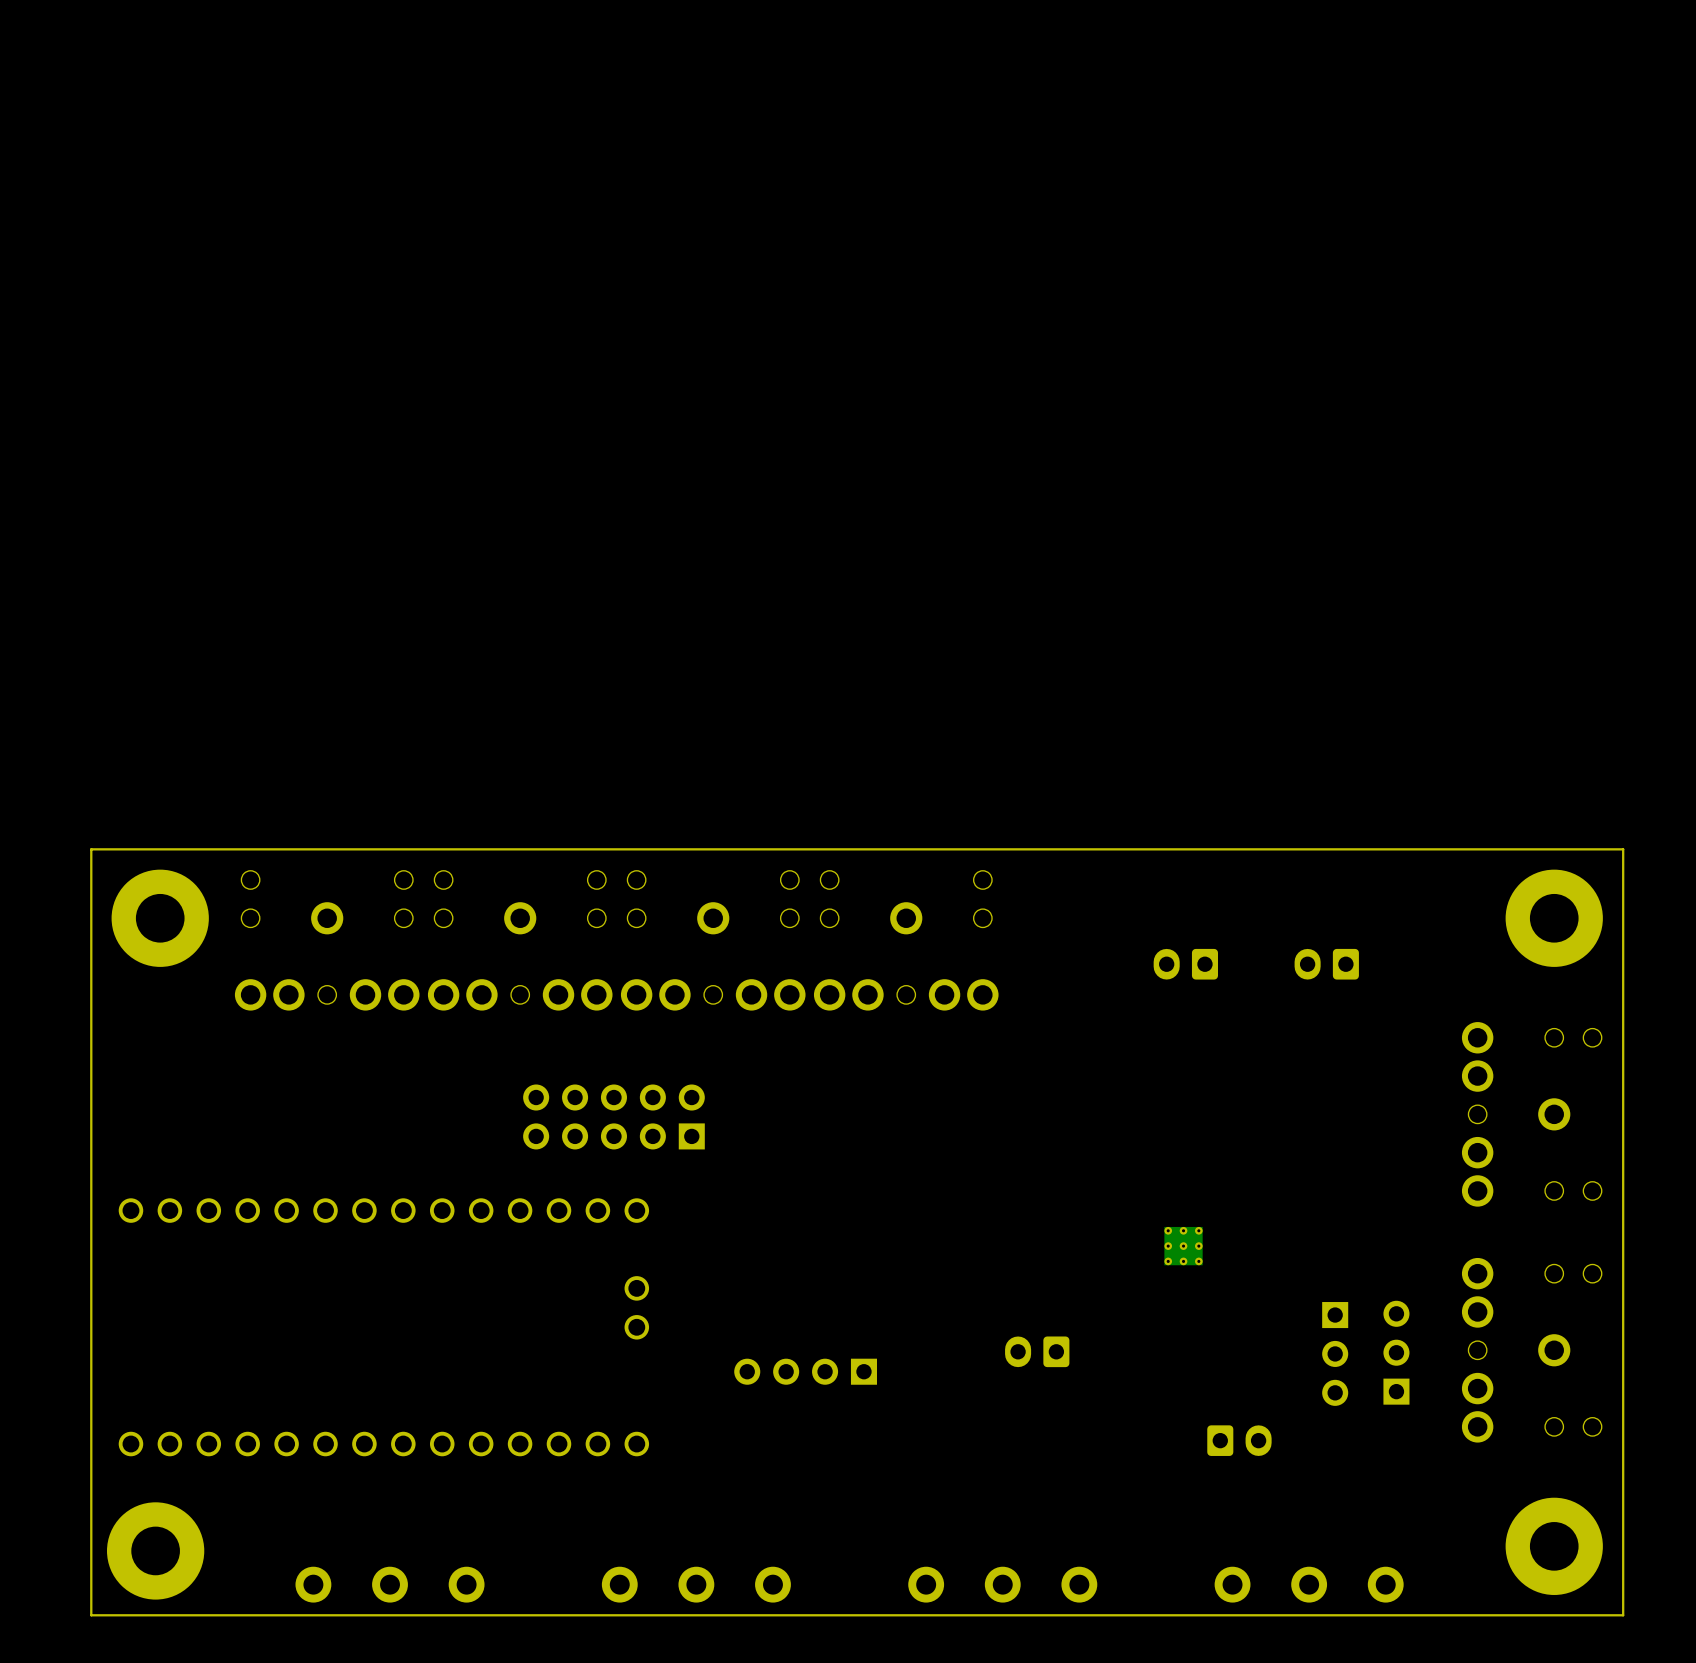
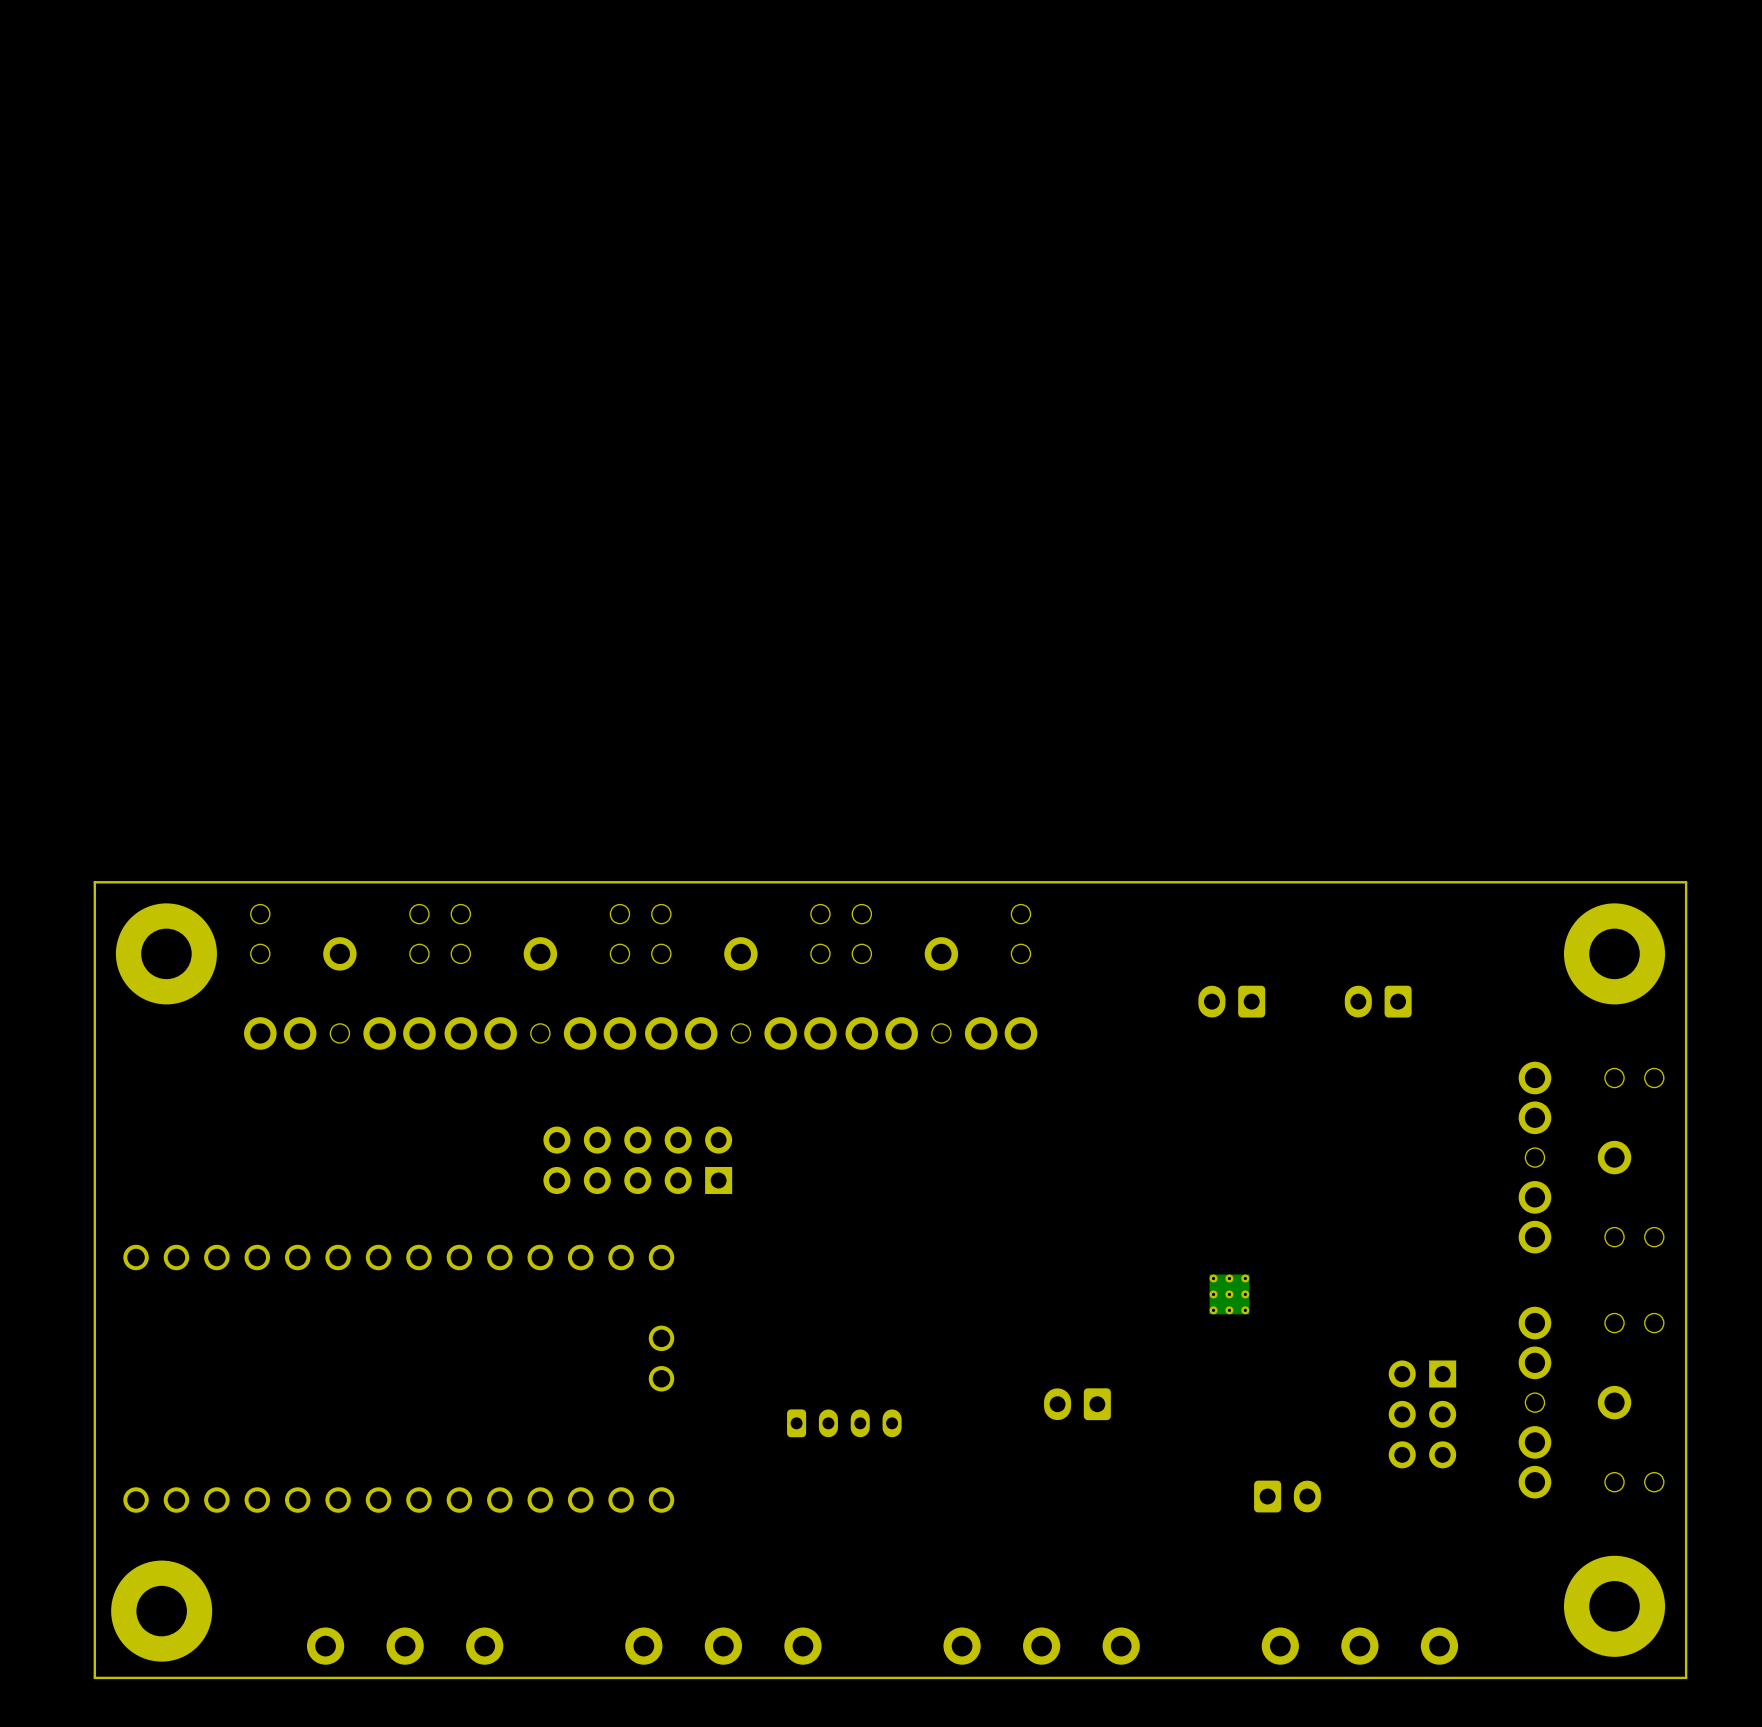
part: (1396, 1352) -> none
part: (1335, 1353) -> none
part footprint: [734, 1358, 877, 1385] -> [787, 1409, 902, 1438]
part: none -> (1422, 1414)

